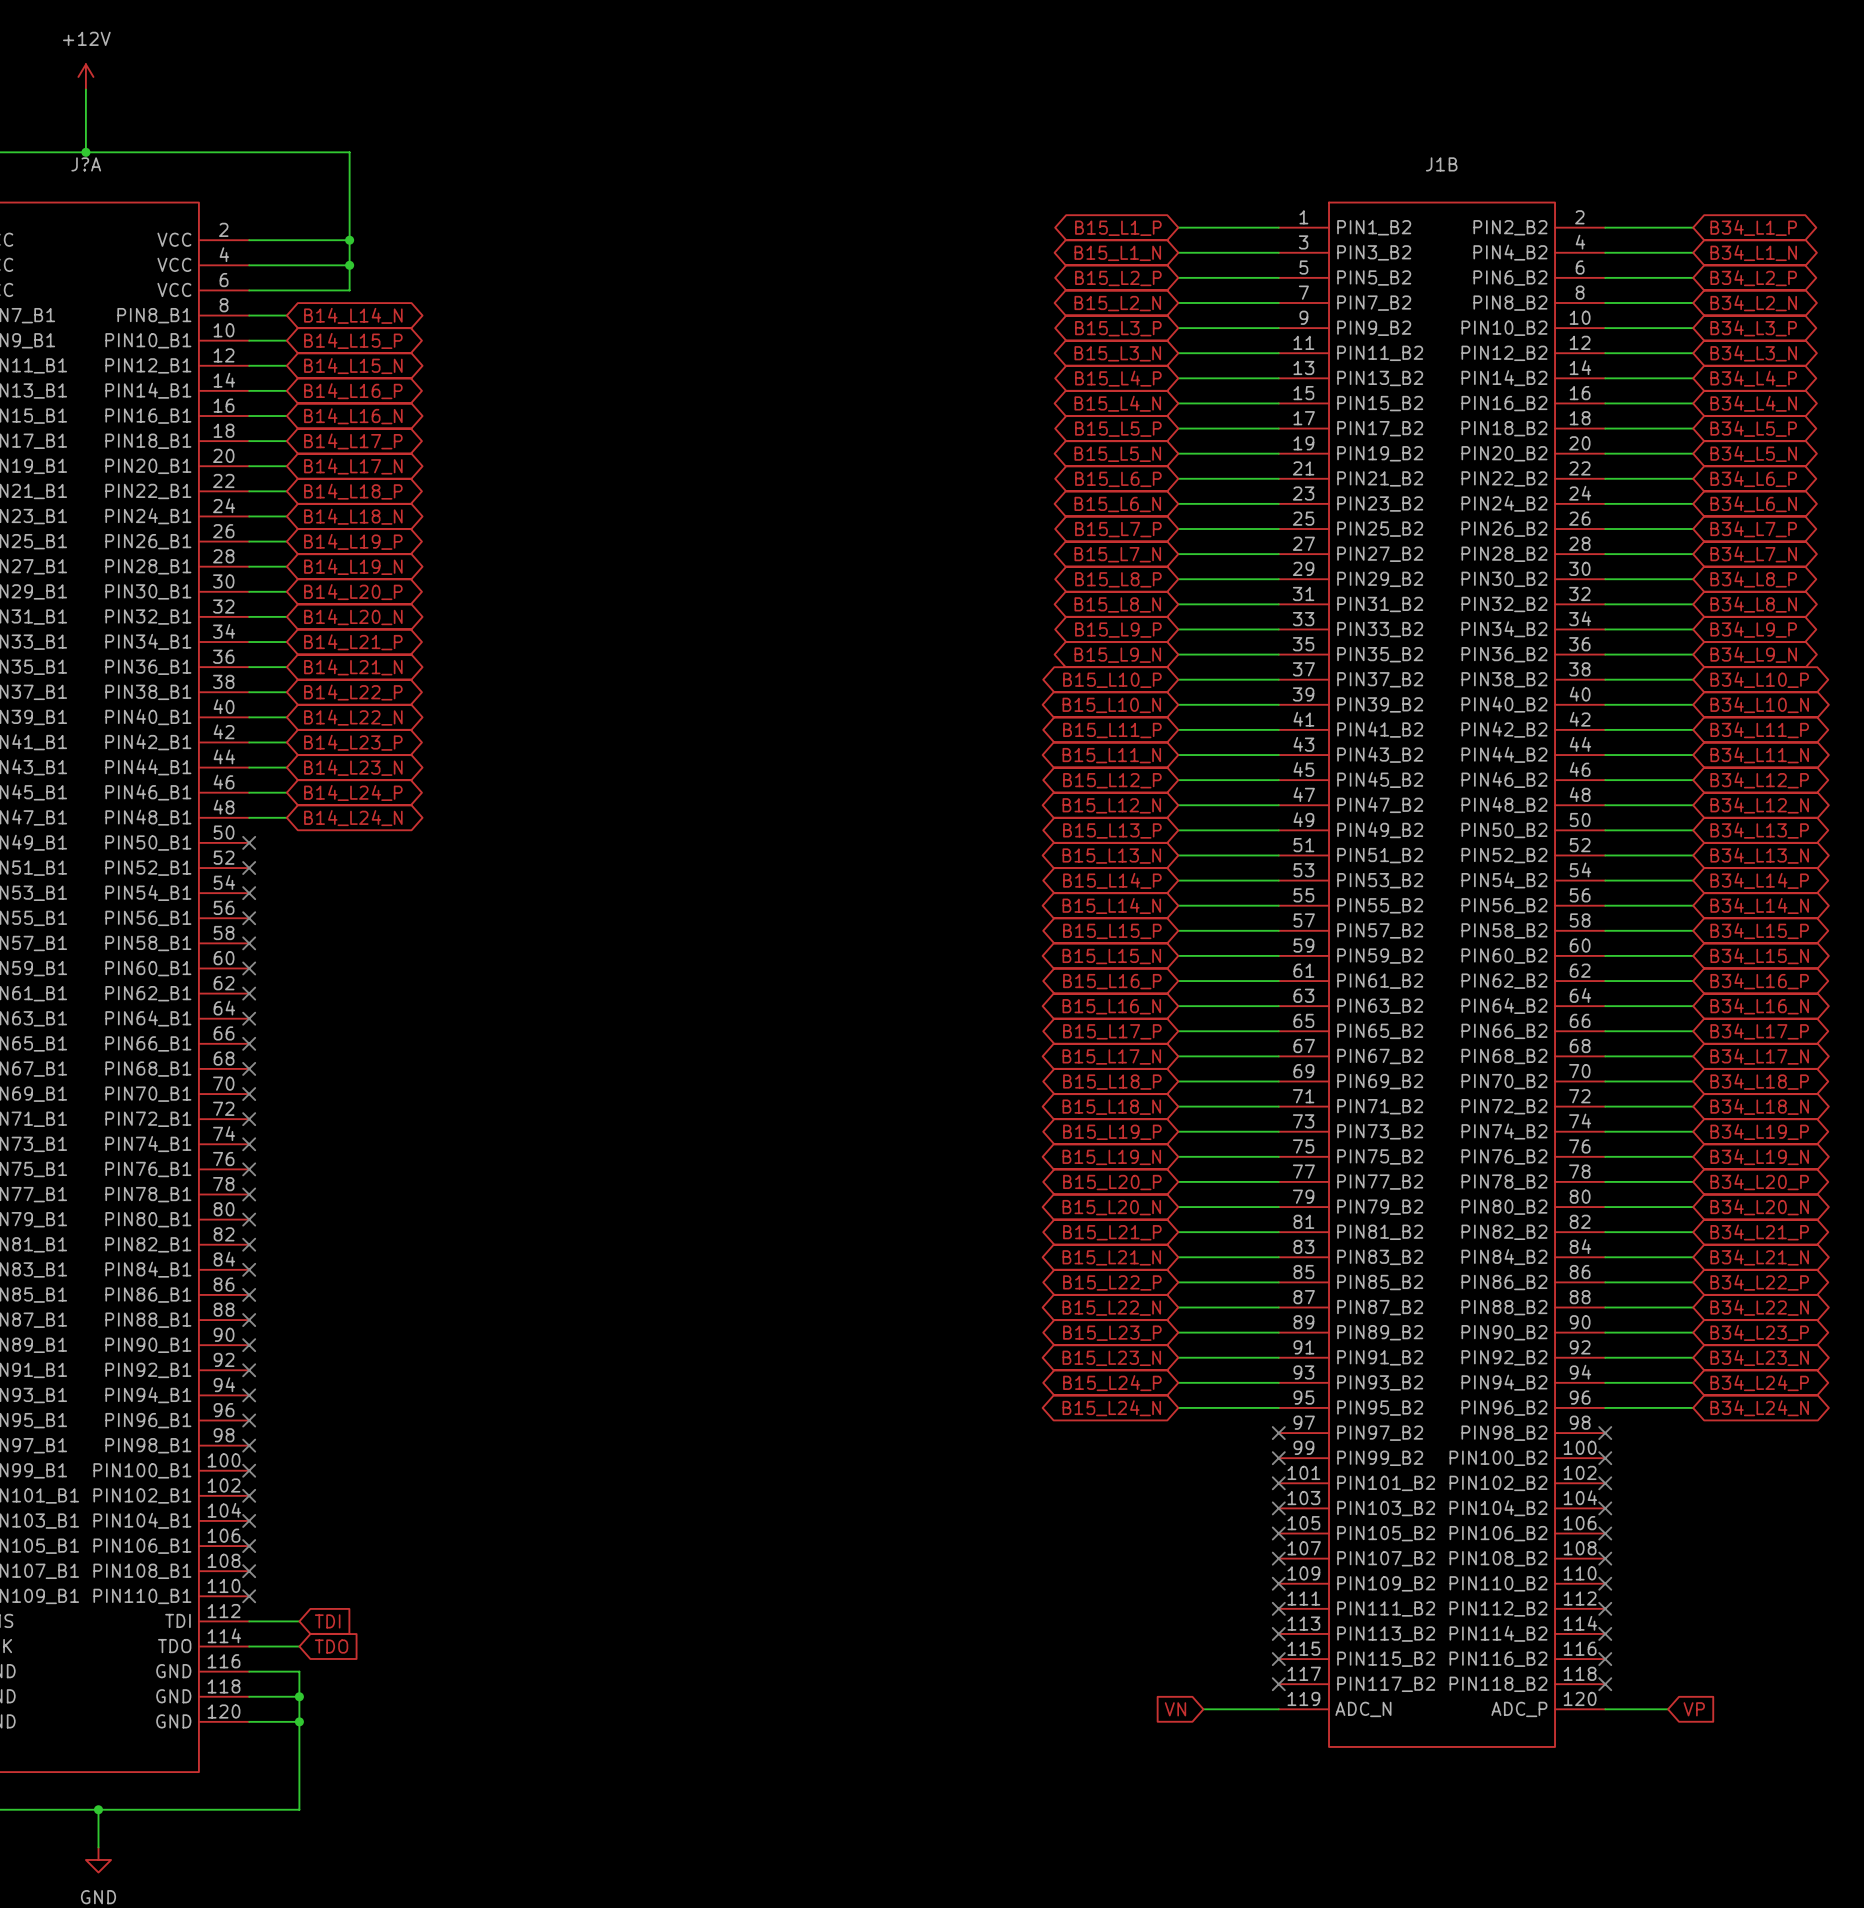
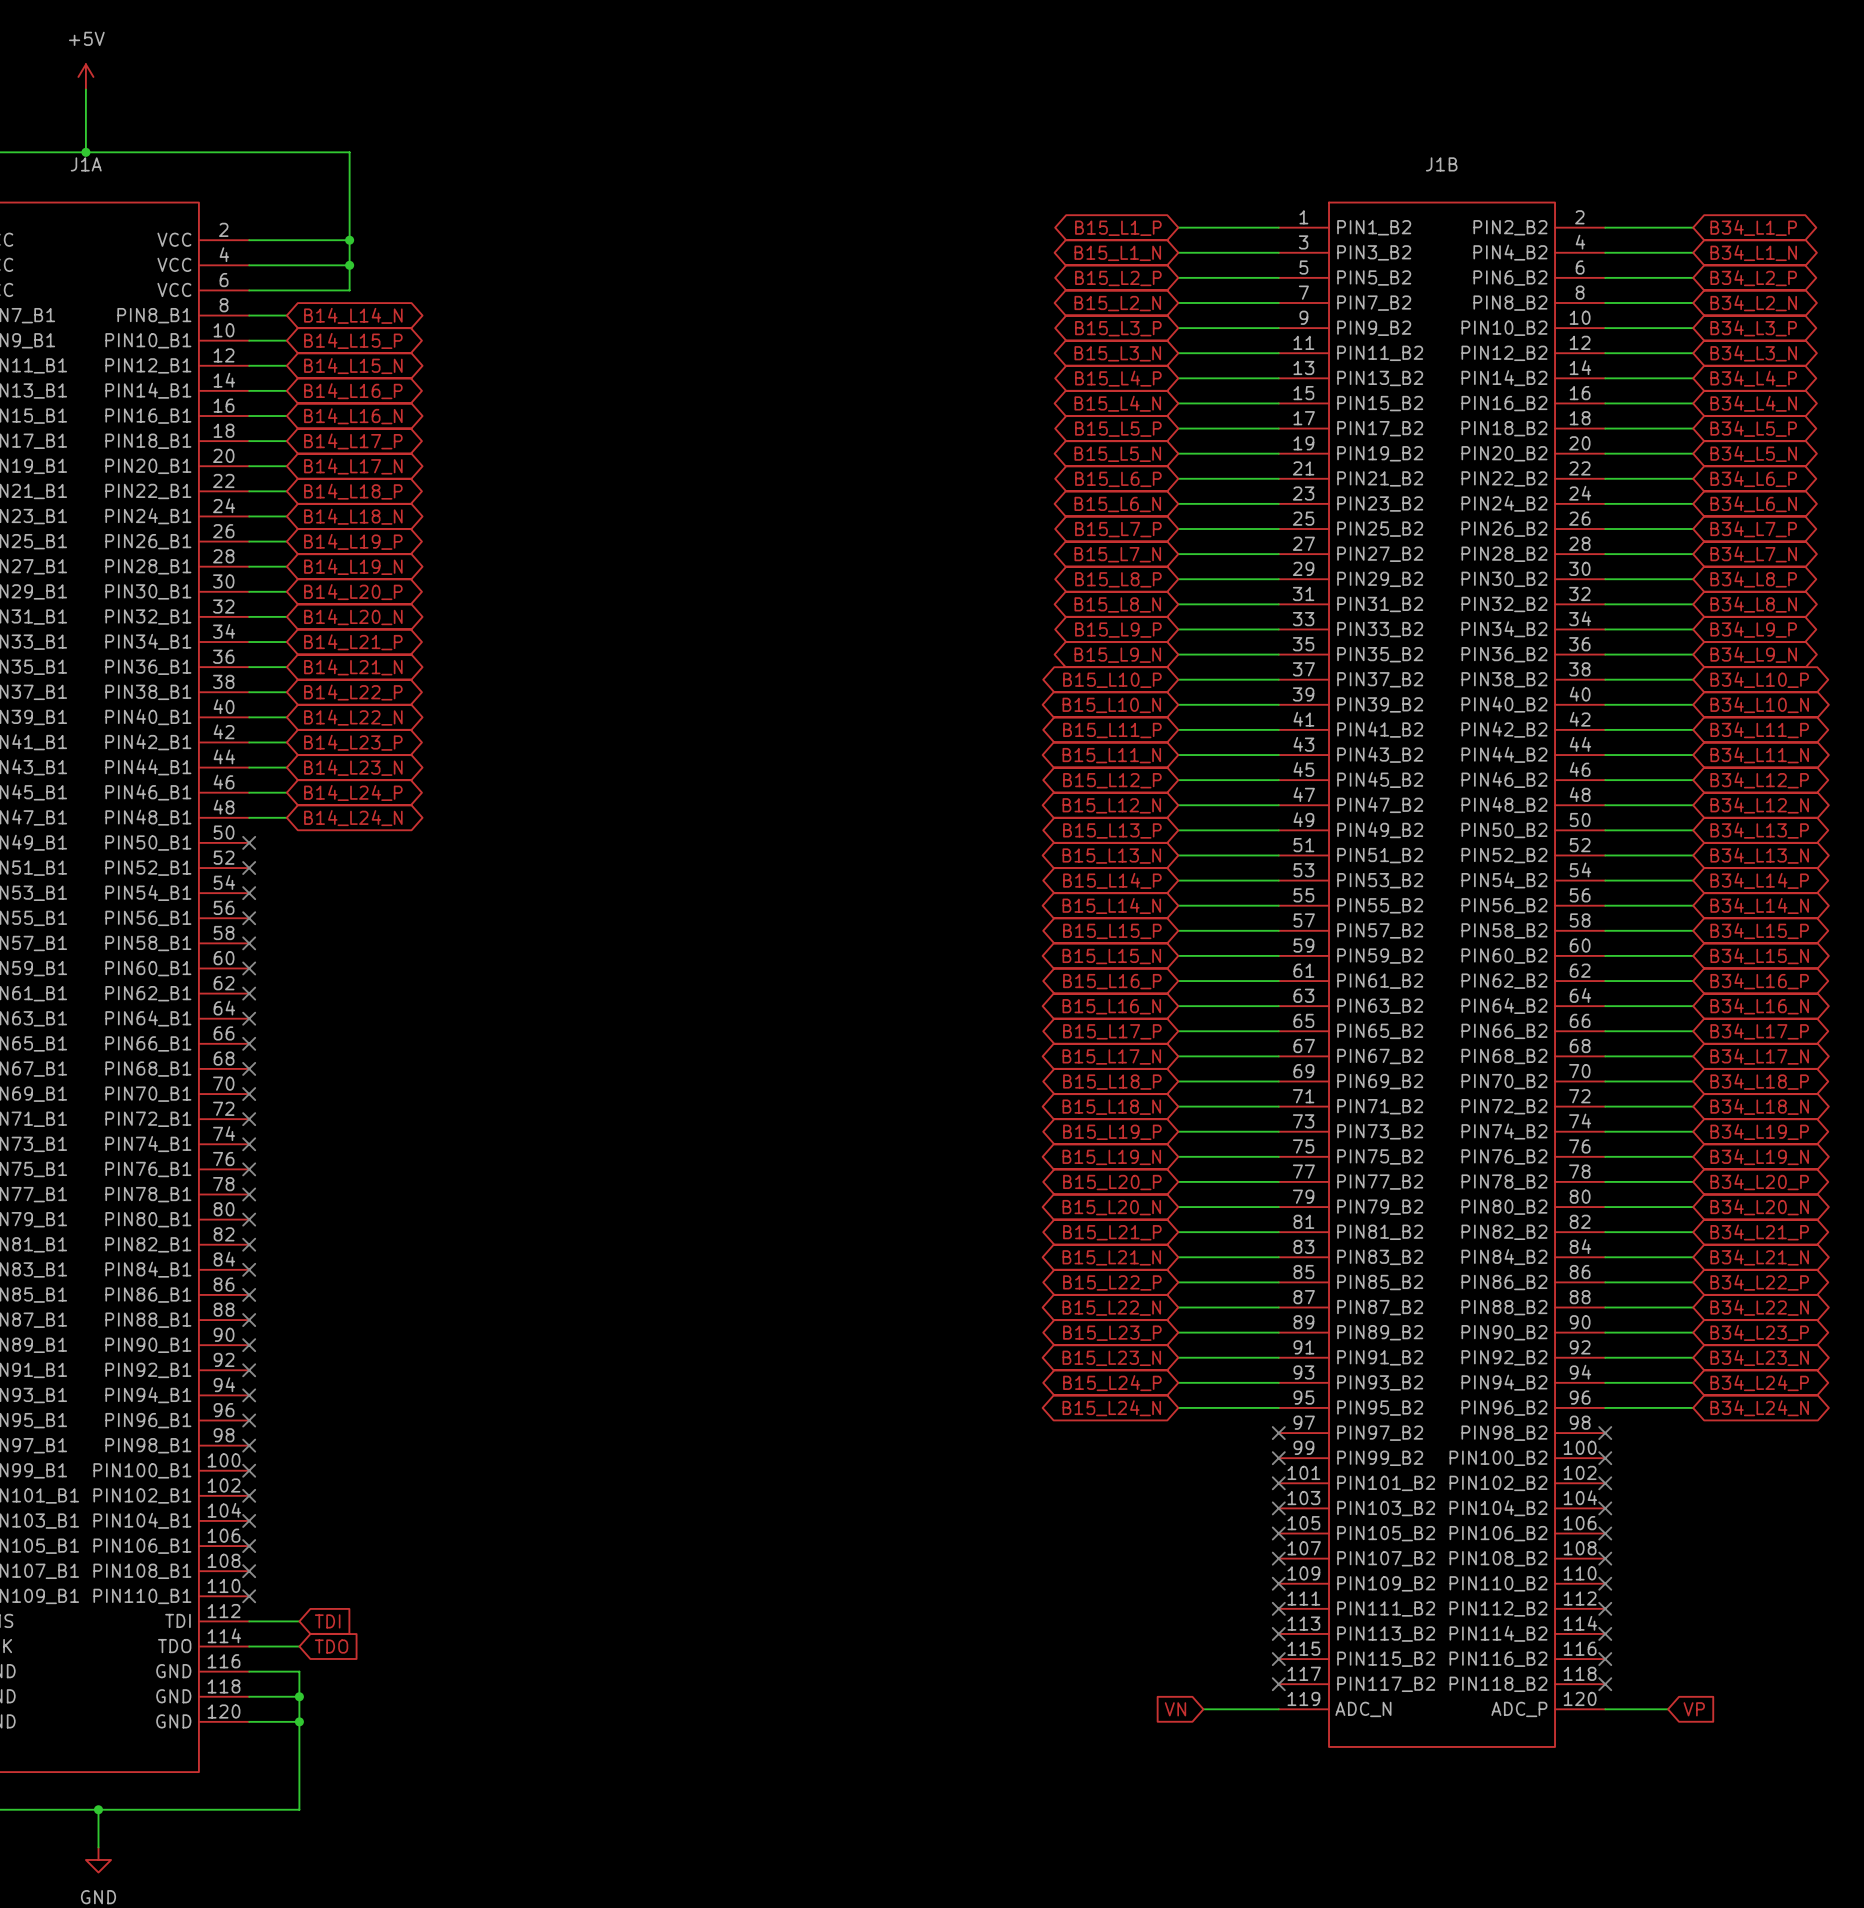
power symbol: +12V (85, 76) -> +5V (85, 76)
J?A name: J?A (86, 164) -> J1A (86, 164)

